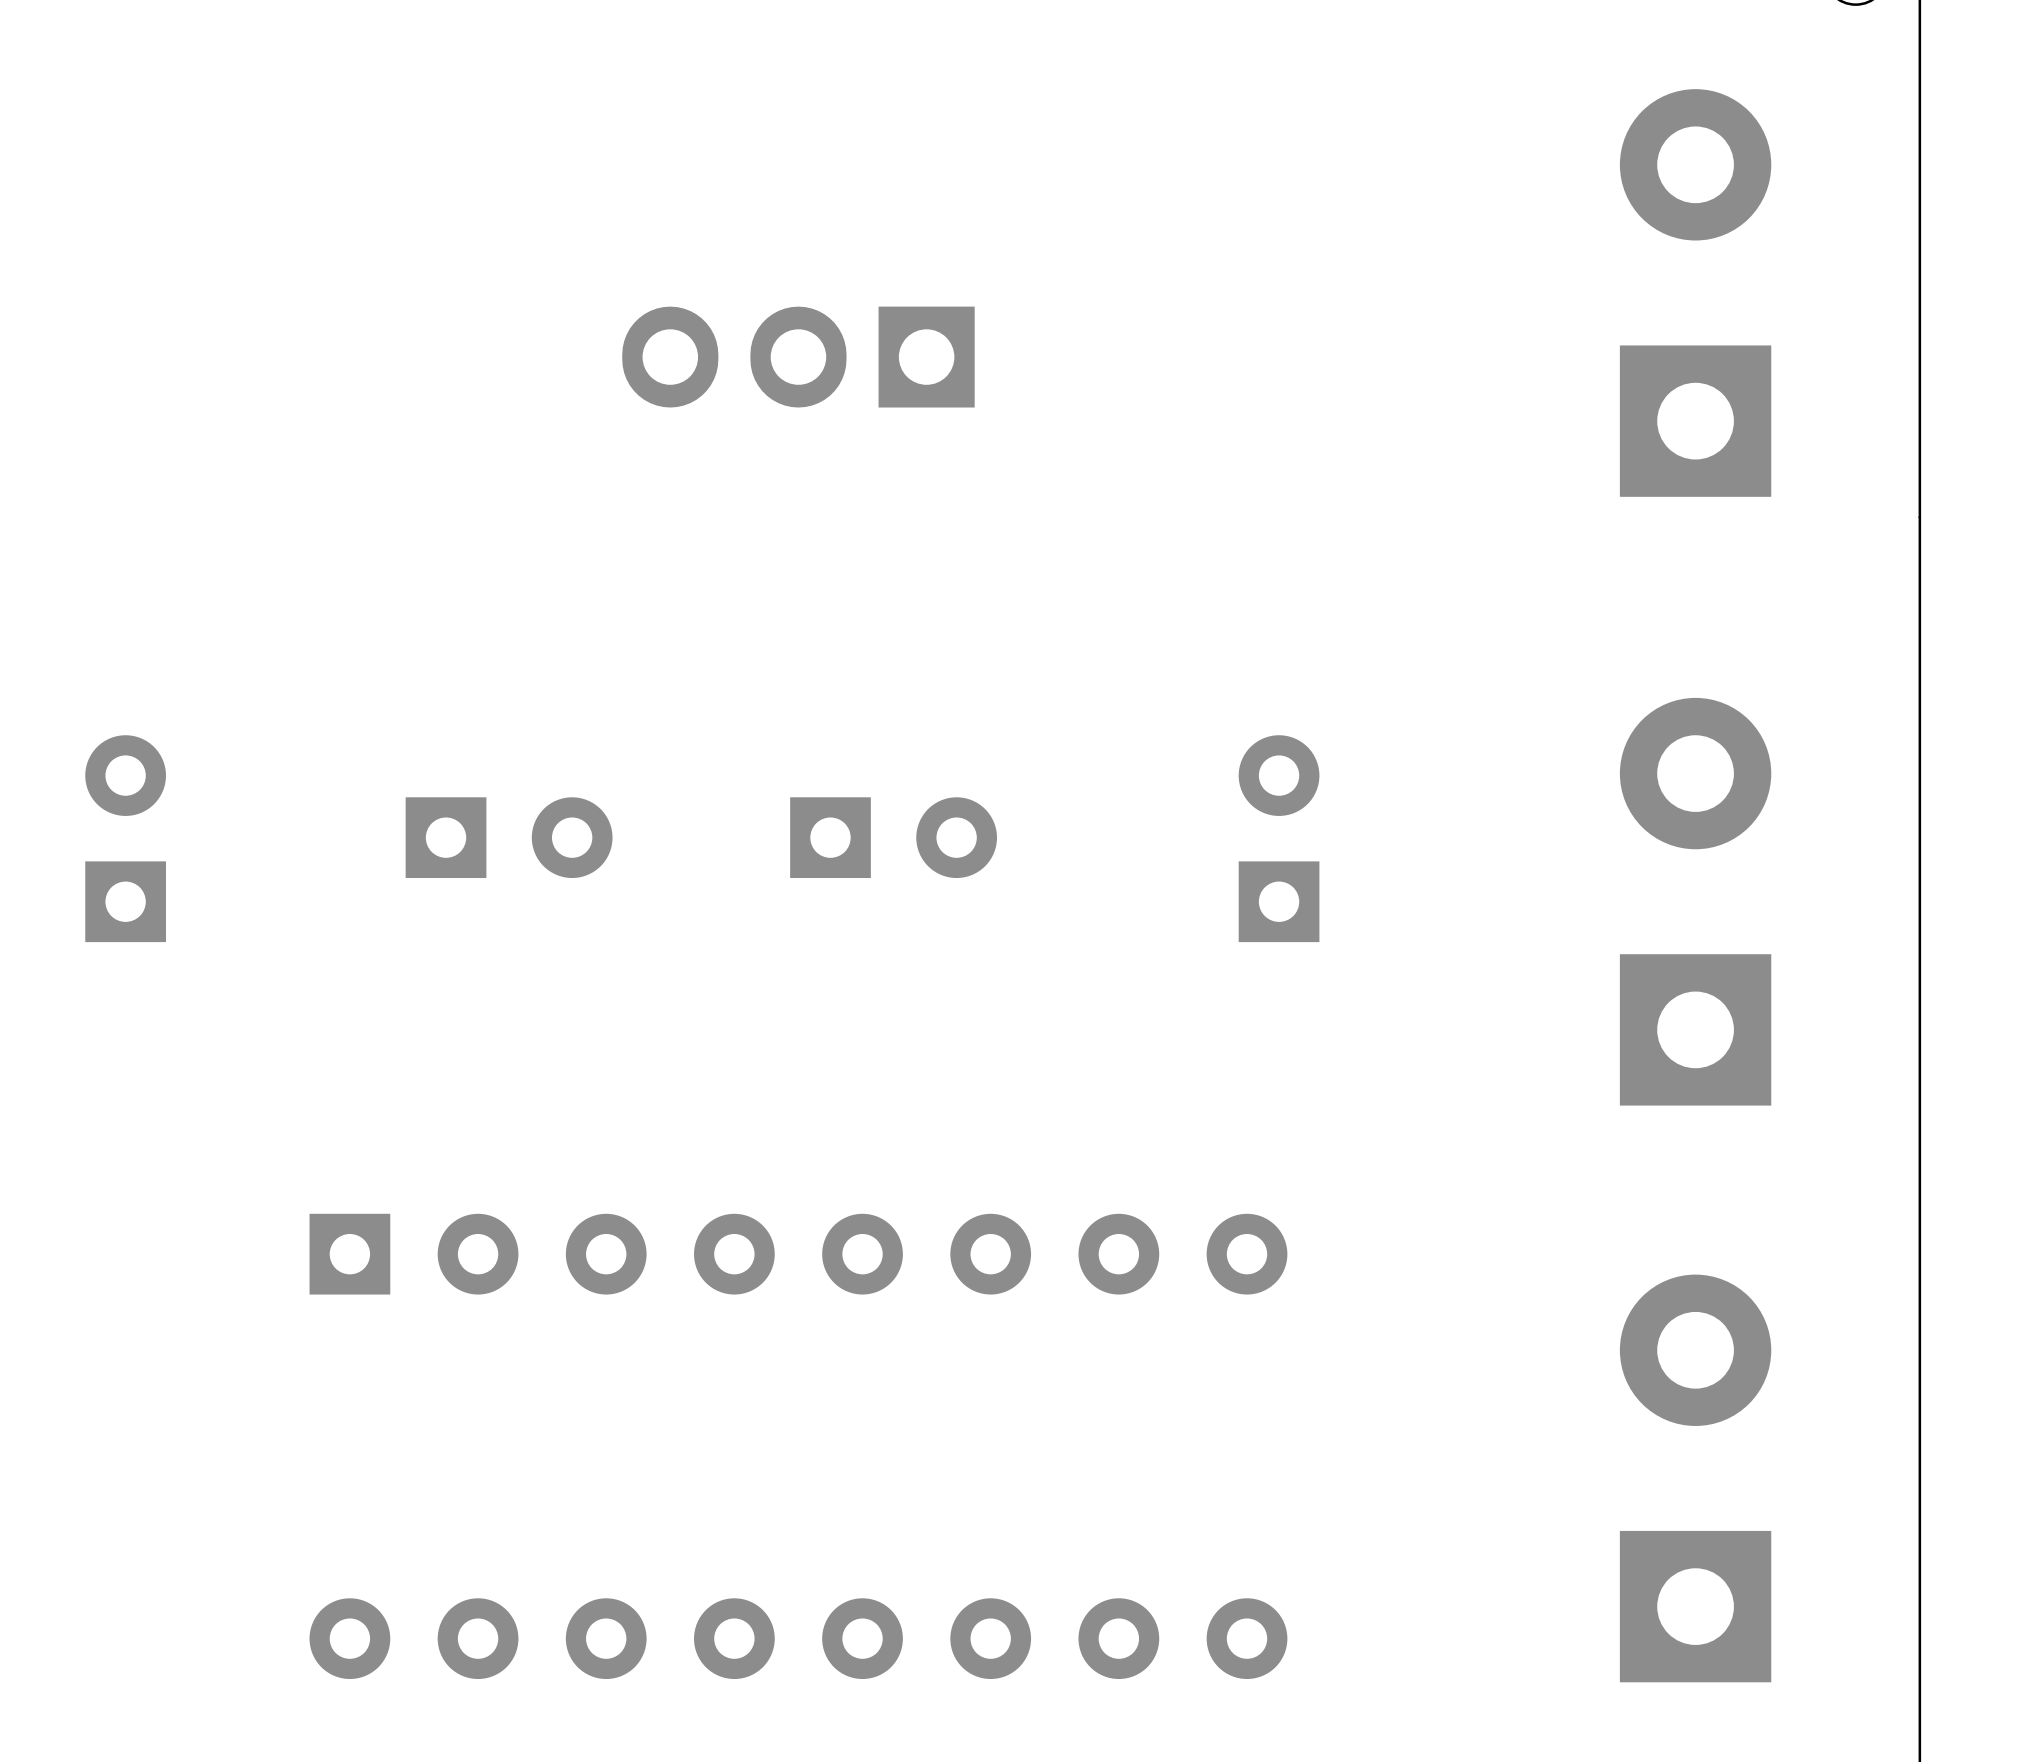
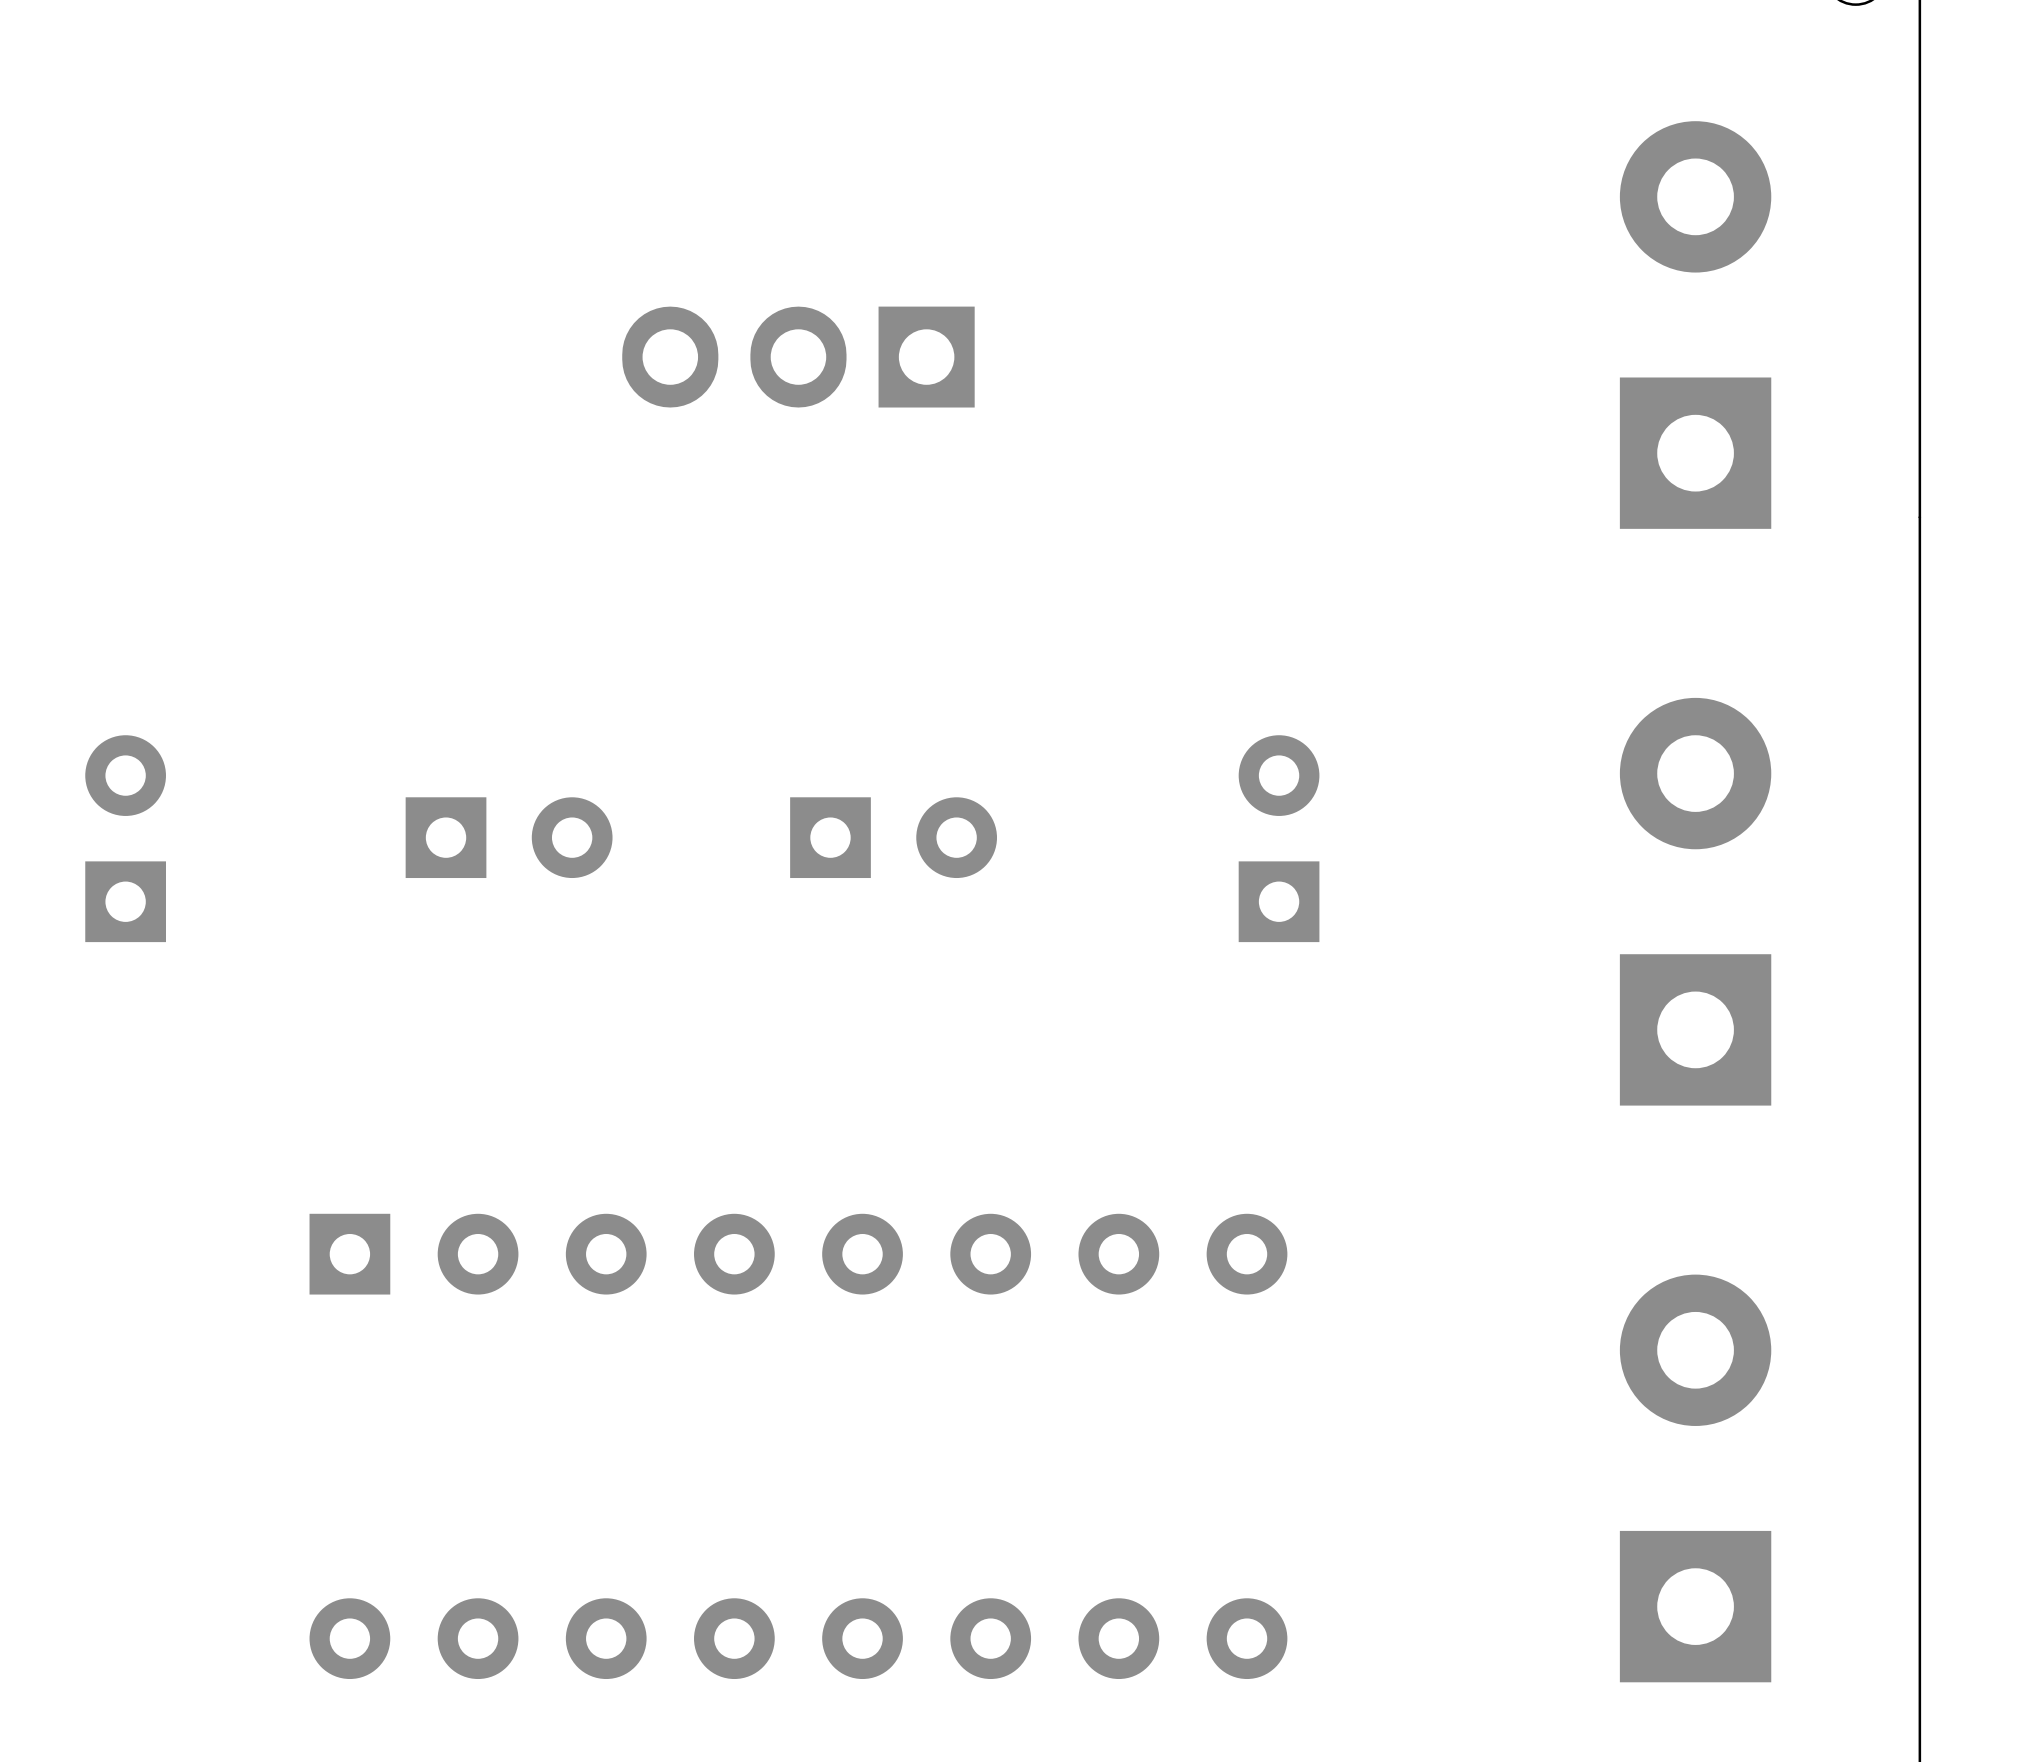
part position: (1695, 292) -> (1695, 325)

